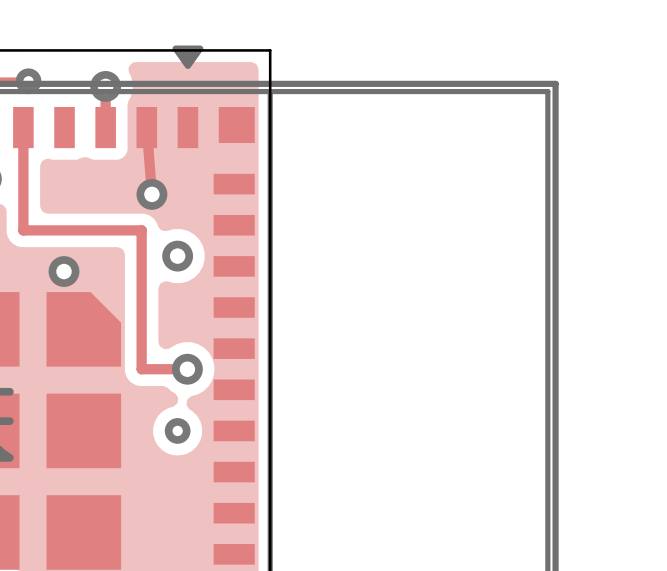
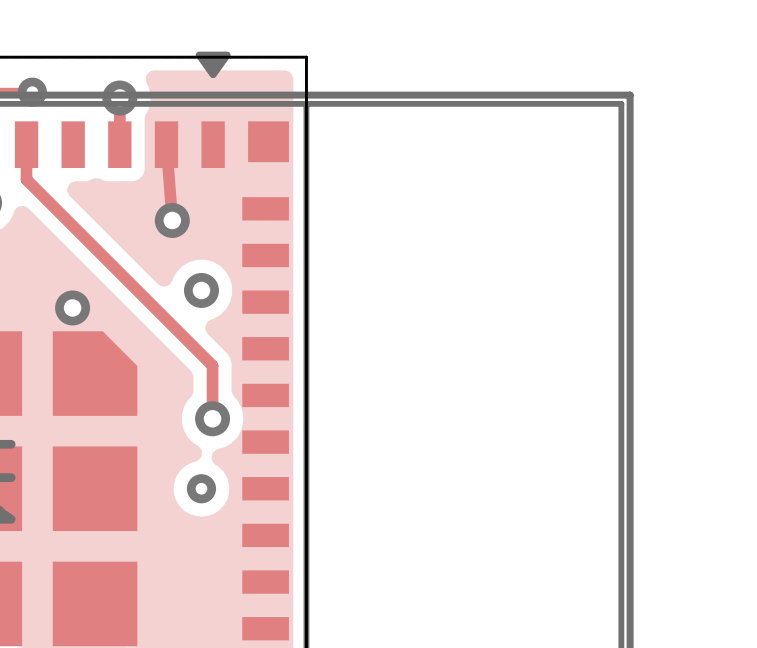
track: (23, 158) (23, 230) (141, 230) (141, 369) (187, 369) -> (26, 179) (212, 365) (212, 418)

